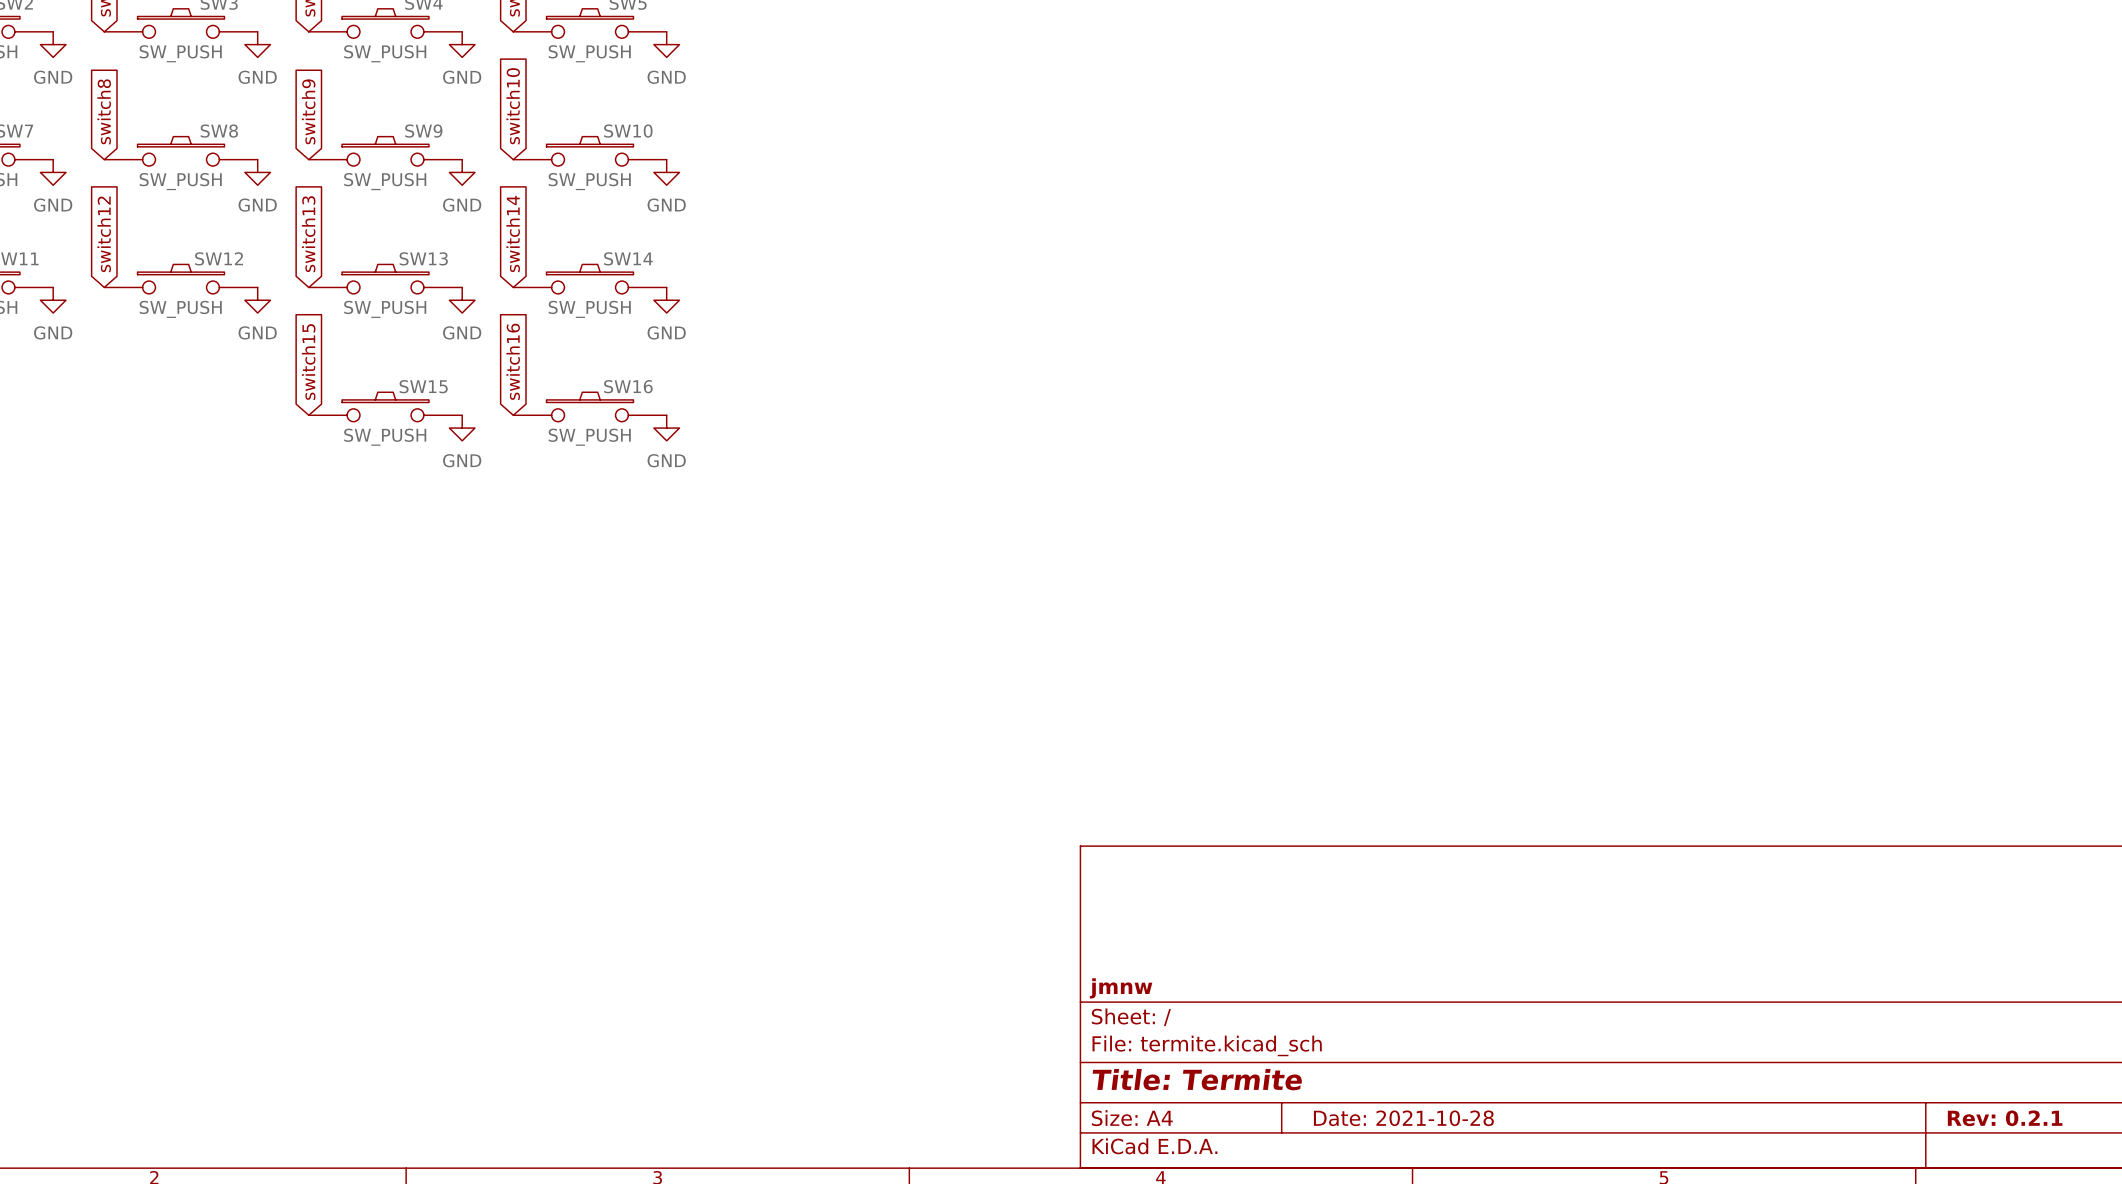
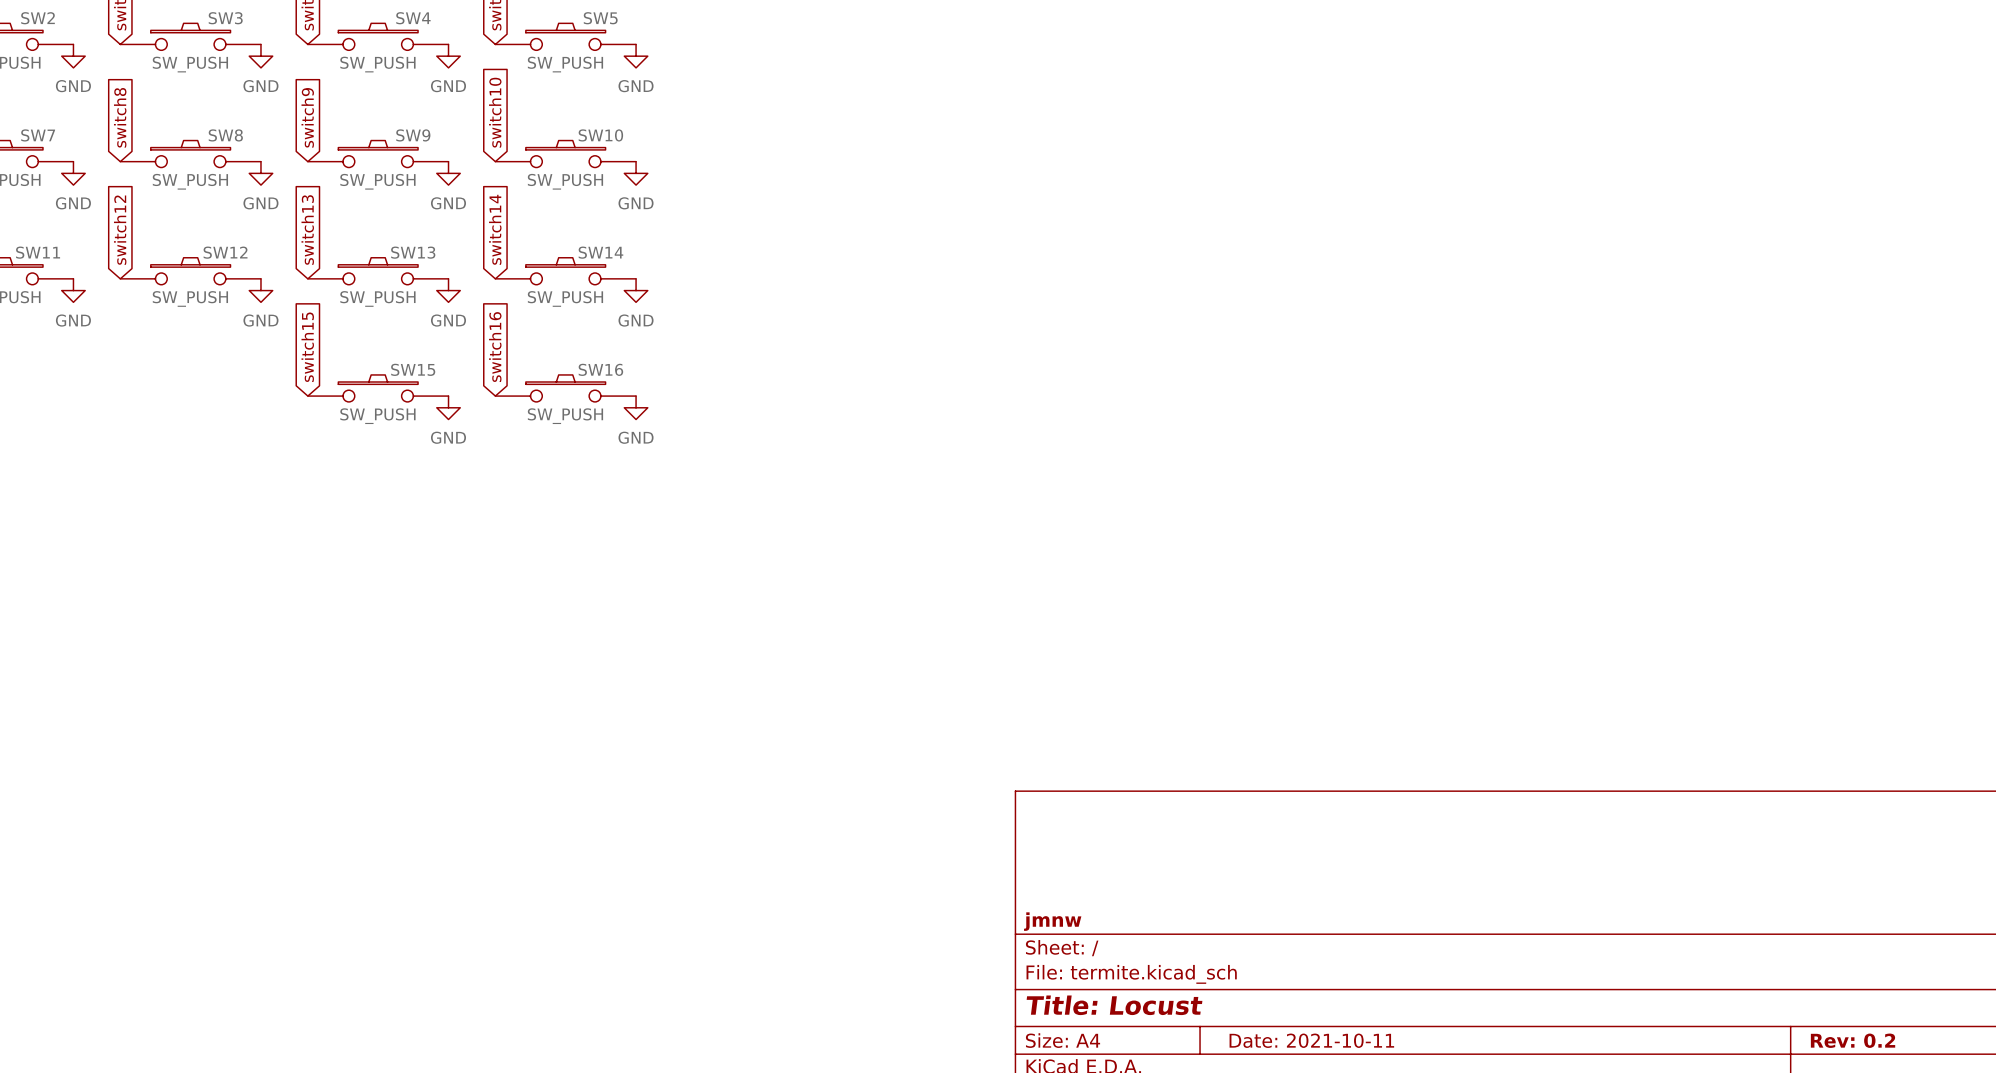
title block: Title: Termite (1197, 1079) -> Title: Locust (1114, 1005)
title block: Date: 2021-10-28 (1403, 1118) -> Date: 2021-10-11 (1311, 1040)
title block: Rev: 0.2.1 (2005, 1118) -> Rev: 0.2 (1853, 1040)

